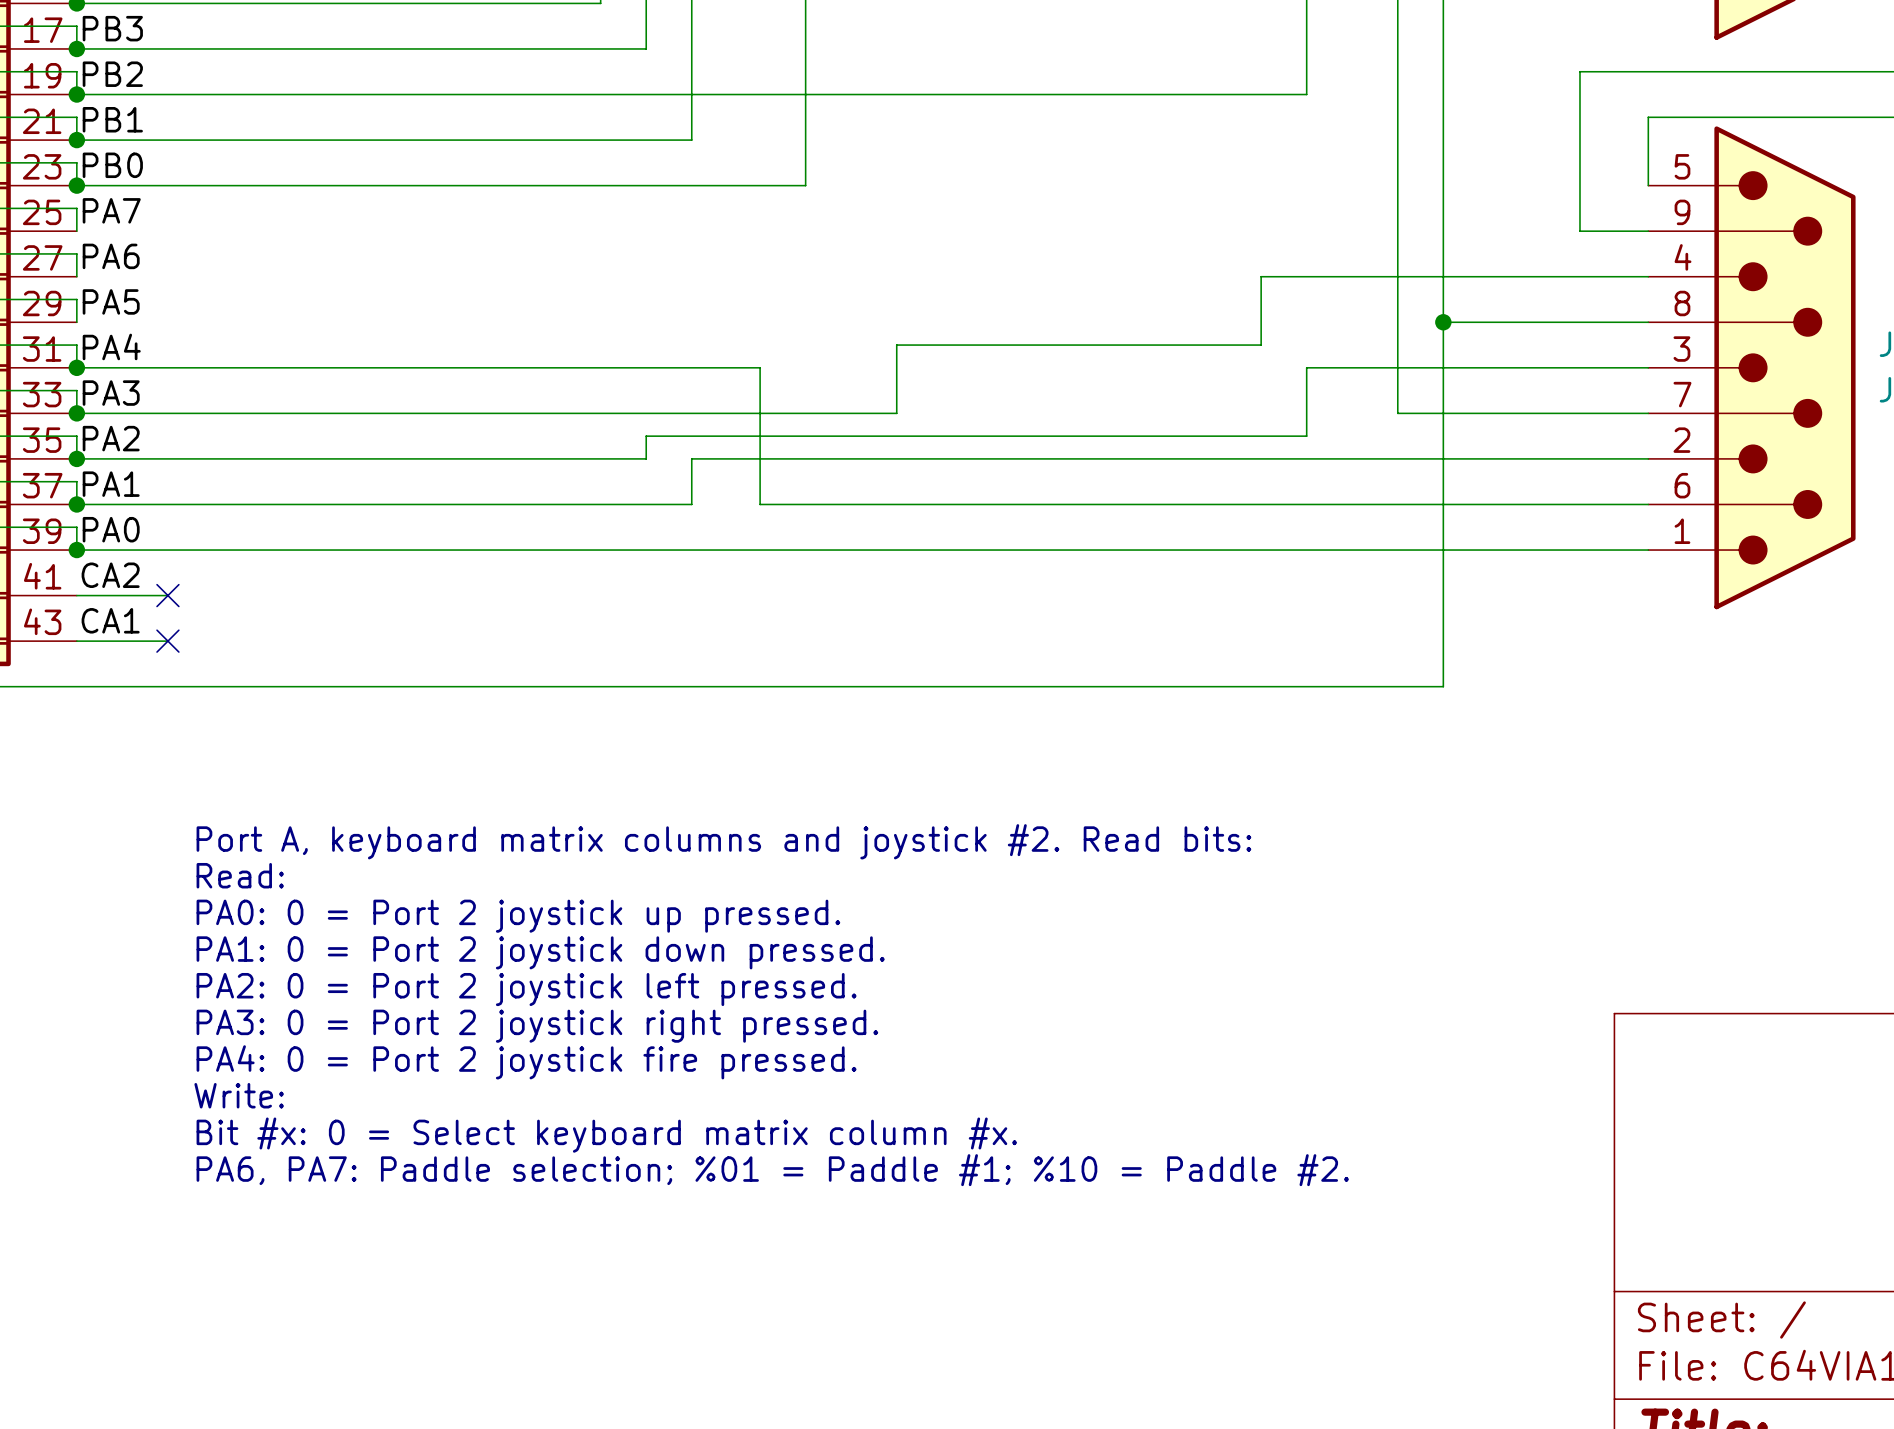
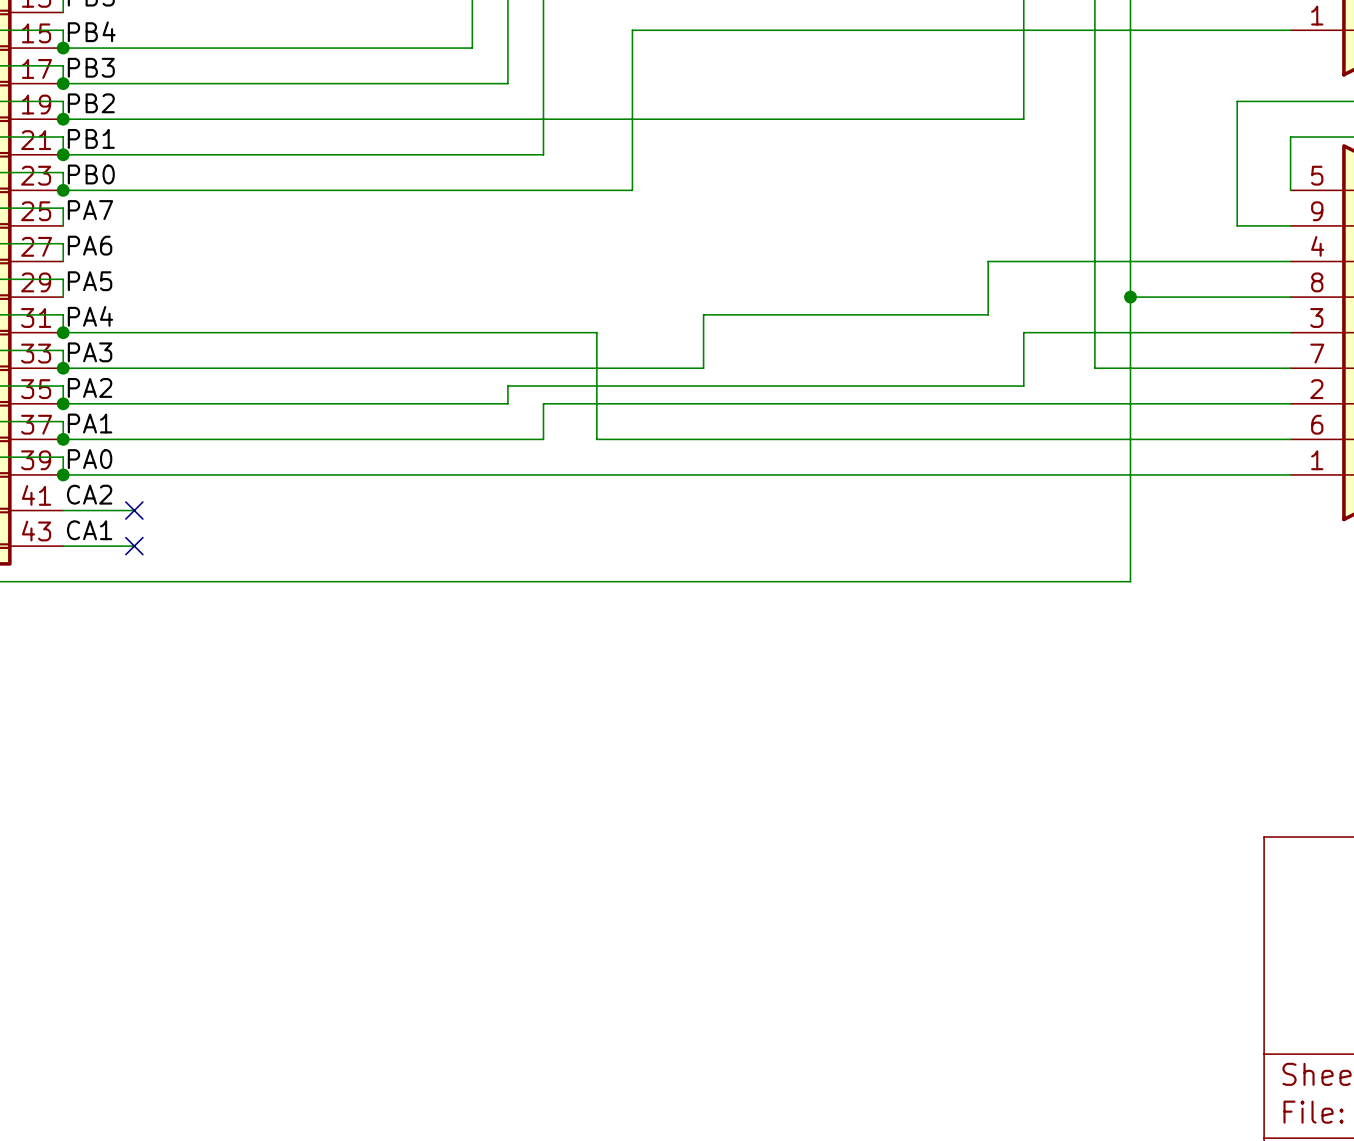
text: Port A, keyboard matrix columns and joystick #2. Read bits: (723, 841) -> none
text: Read: (240, 875) -> none
text: PA0: 0 = Port 2 joystick up pressed. (518, 916) -> none
text: PA1: 0 = Port 2 joystick down pressed. (540, 952) -> none
text: PA2: 0 = Port 2 joystick left pressed. (526, 989) -> none
text: PA3: 0 = Port 2 joystick right pressed. (537, 1026) -> none
text: PA4: 0 = Port 2 joystick fire pressed. (526, 1062) -> none
text: Write: (239, 1095) -> none
text: Bit #x: 0 = Select keyboard matrix column #x. (606, 1135) -> none
text: PA6, PA7: Paddle selection; %01 = Paddle #1; %10 = Paddle #2. (772, 1170) -> none

